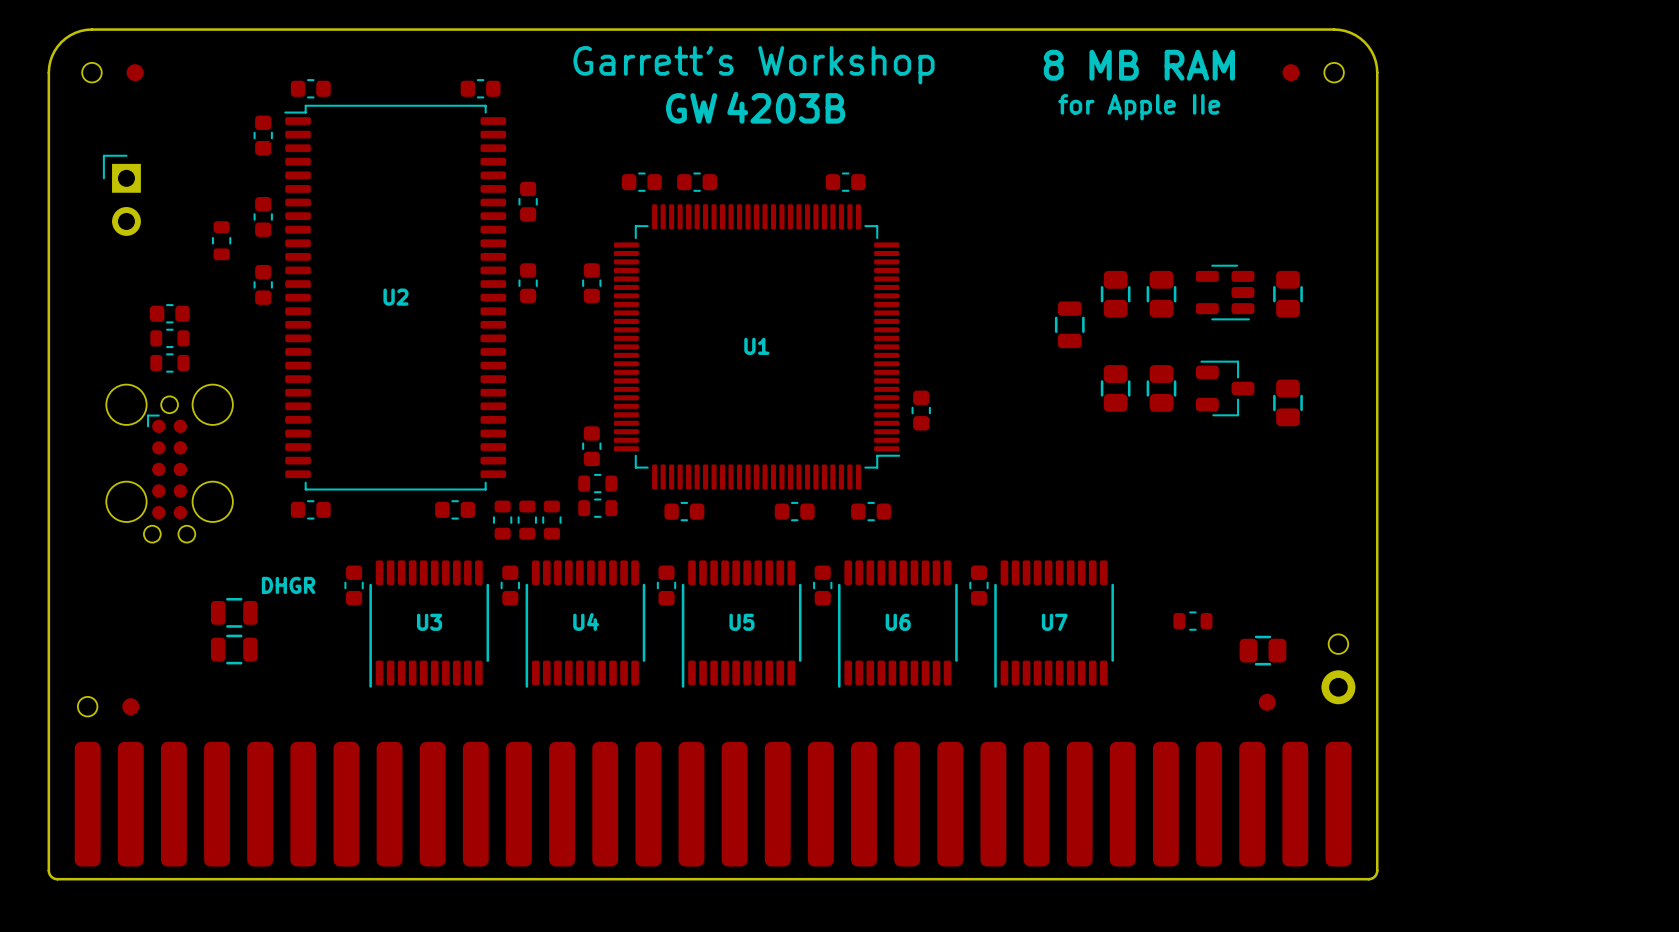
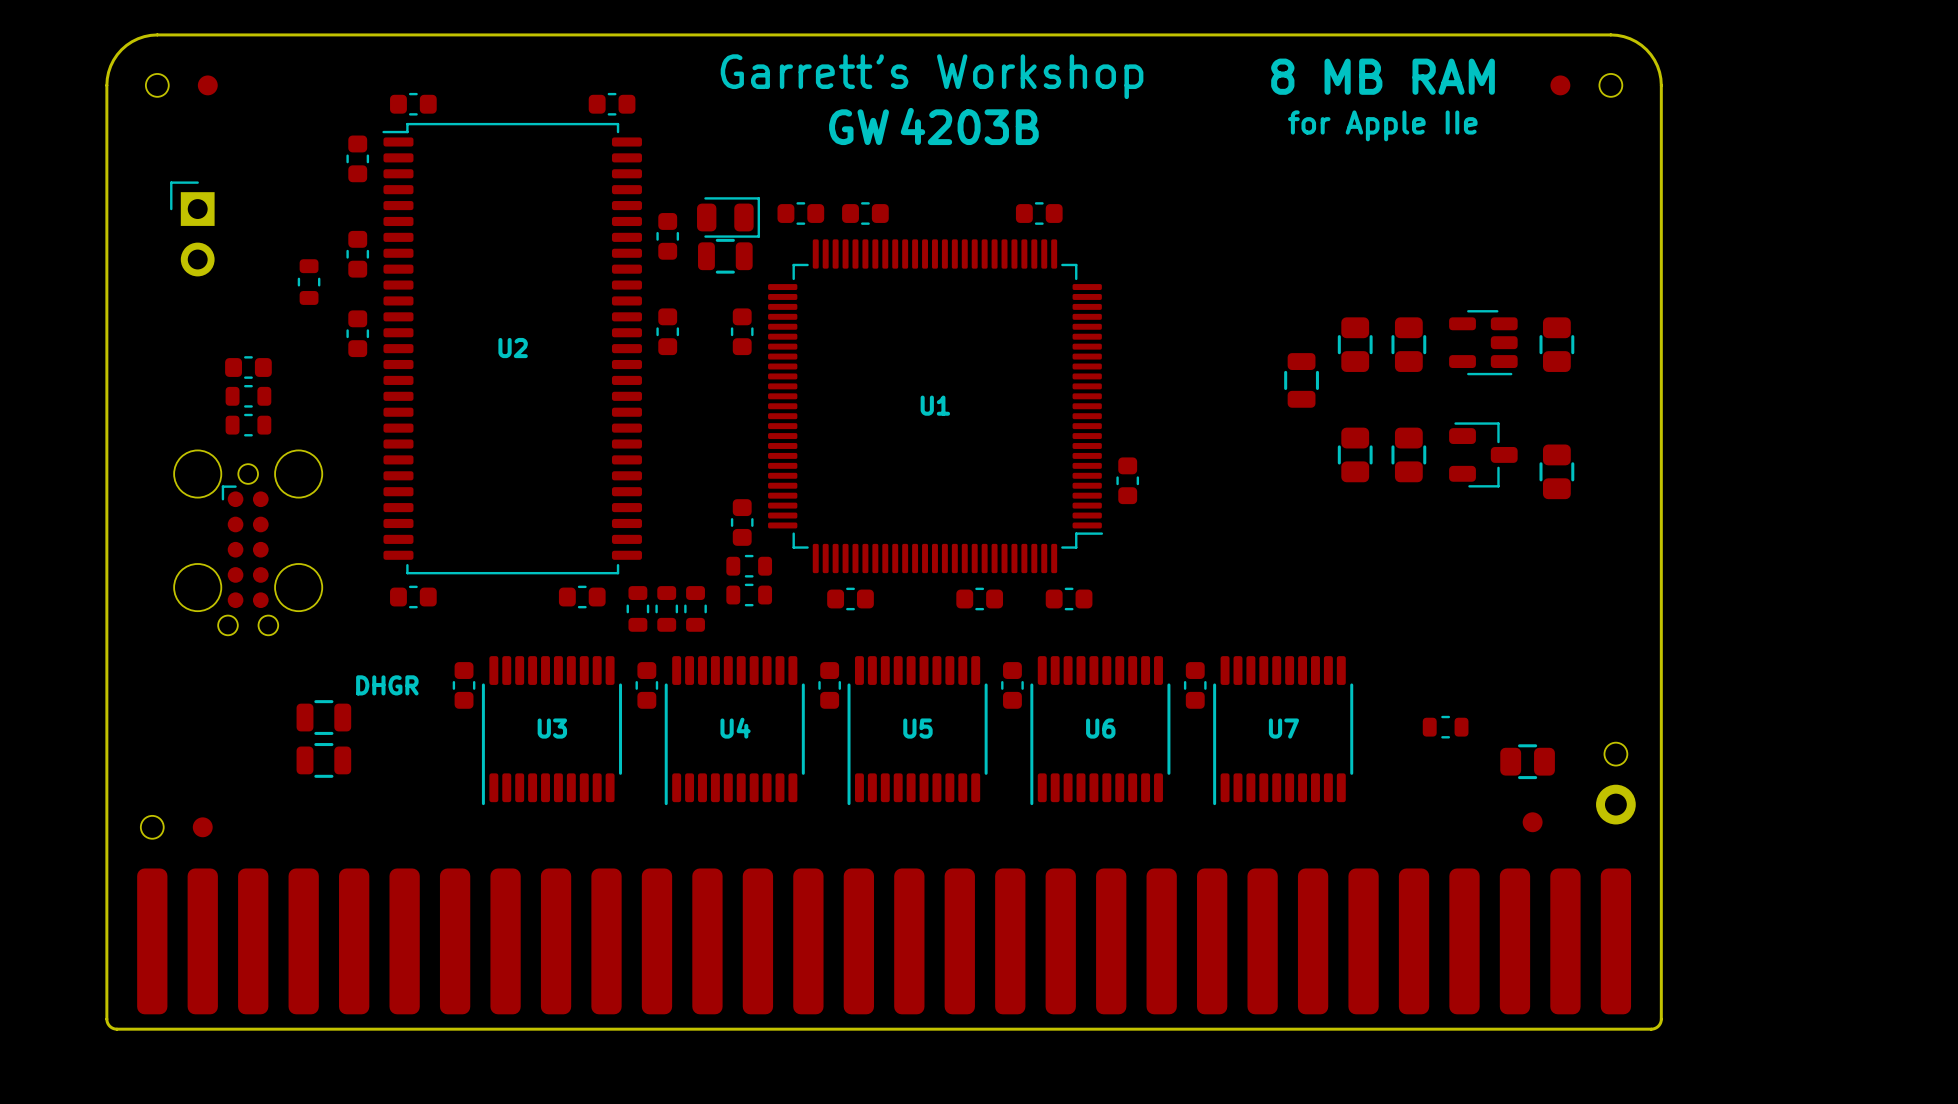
part: none -> (728, 217)
part: none -> (725, 256)

